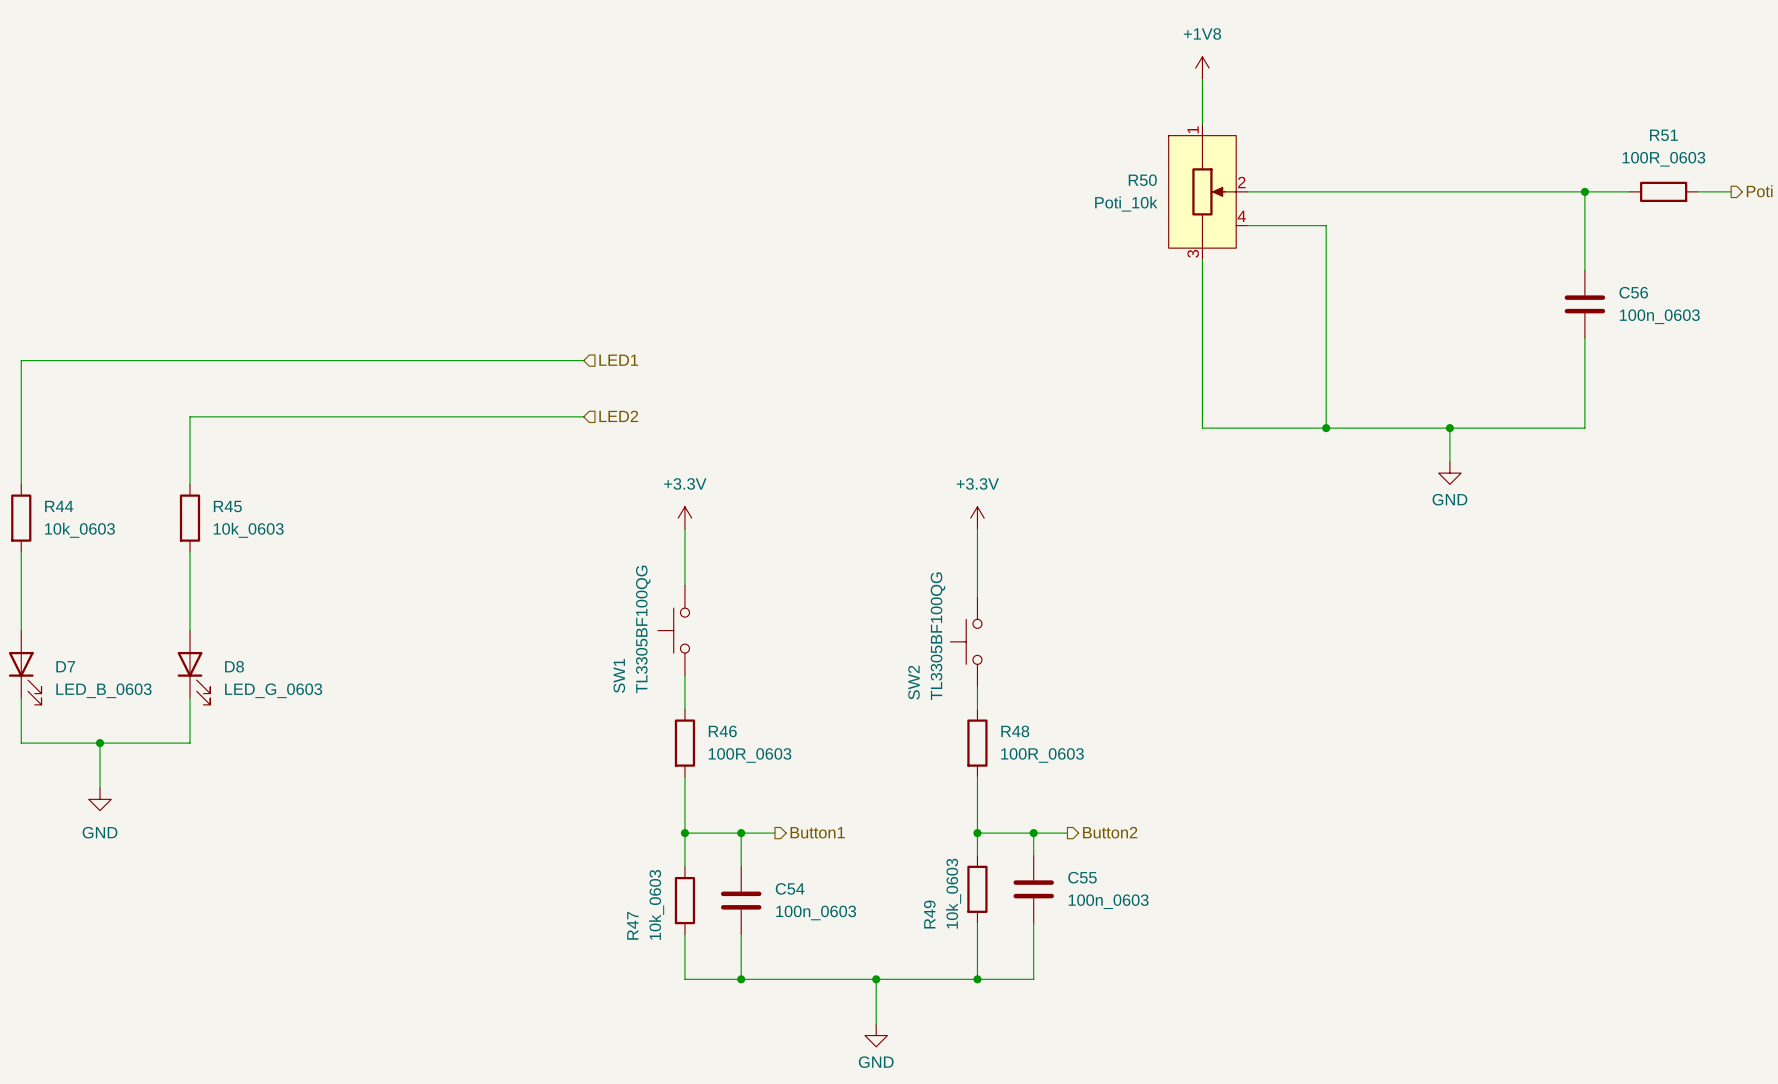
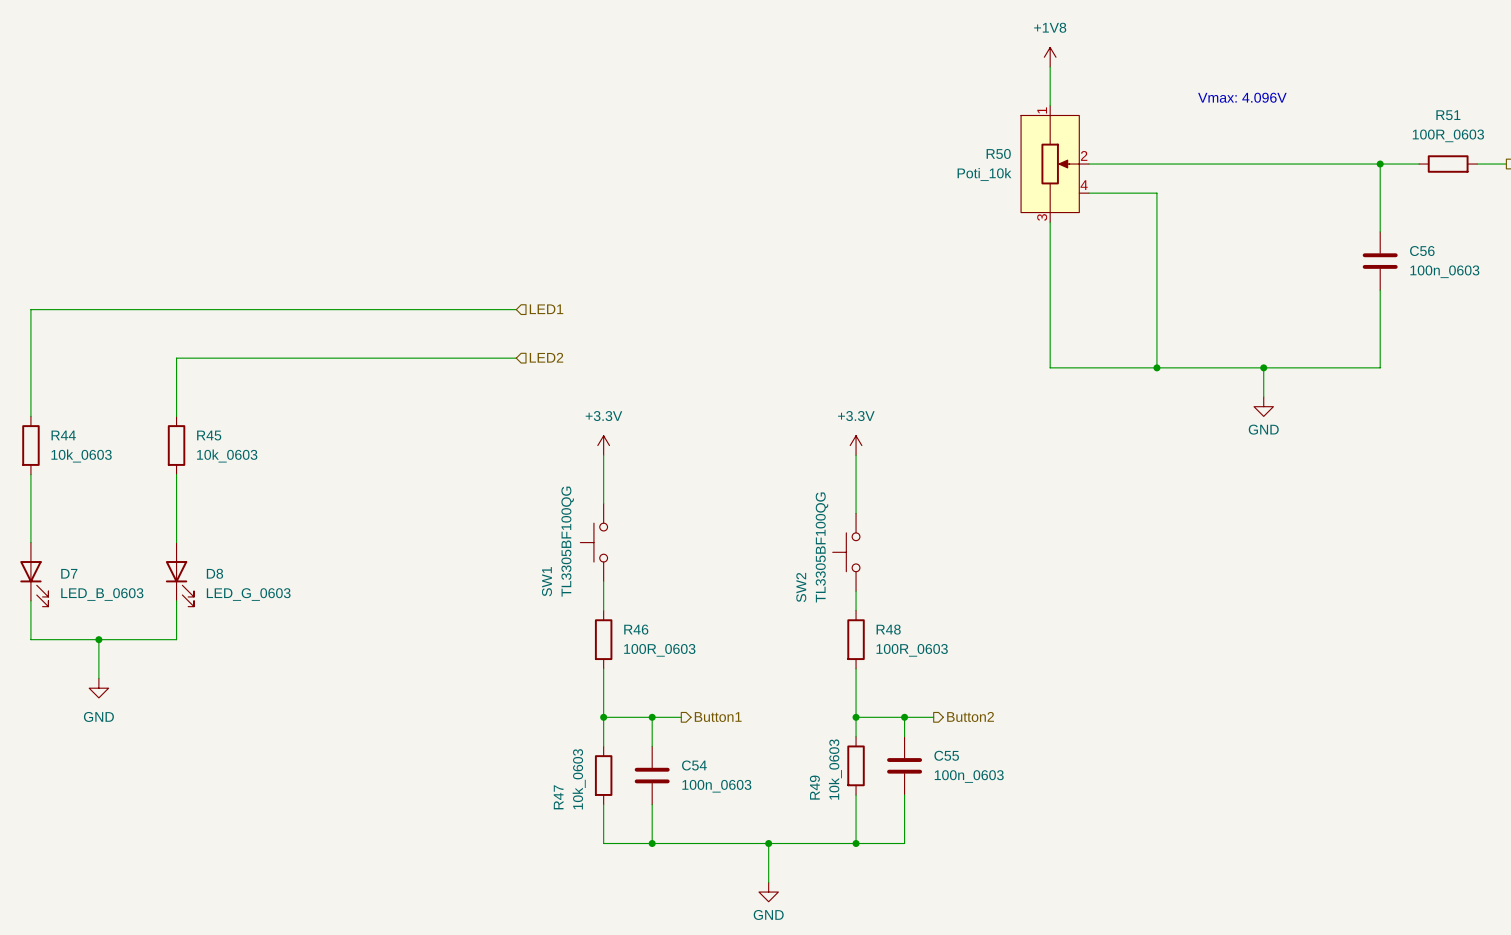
text: none -> Vmax: 4.096V (1242, 97)

